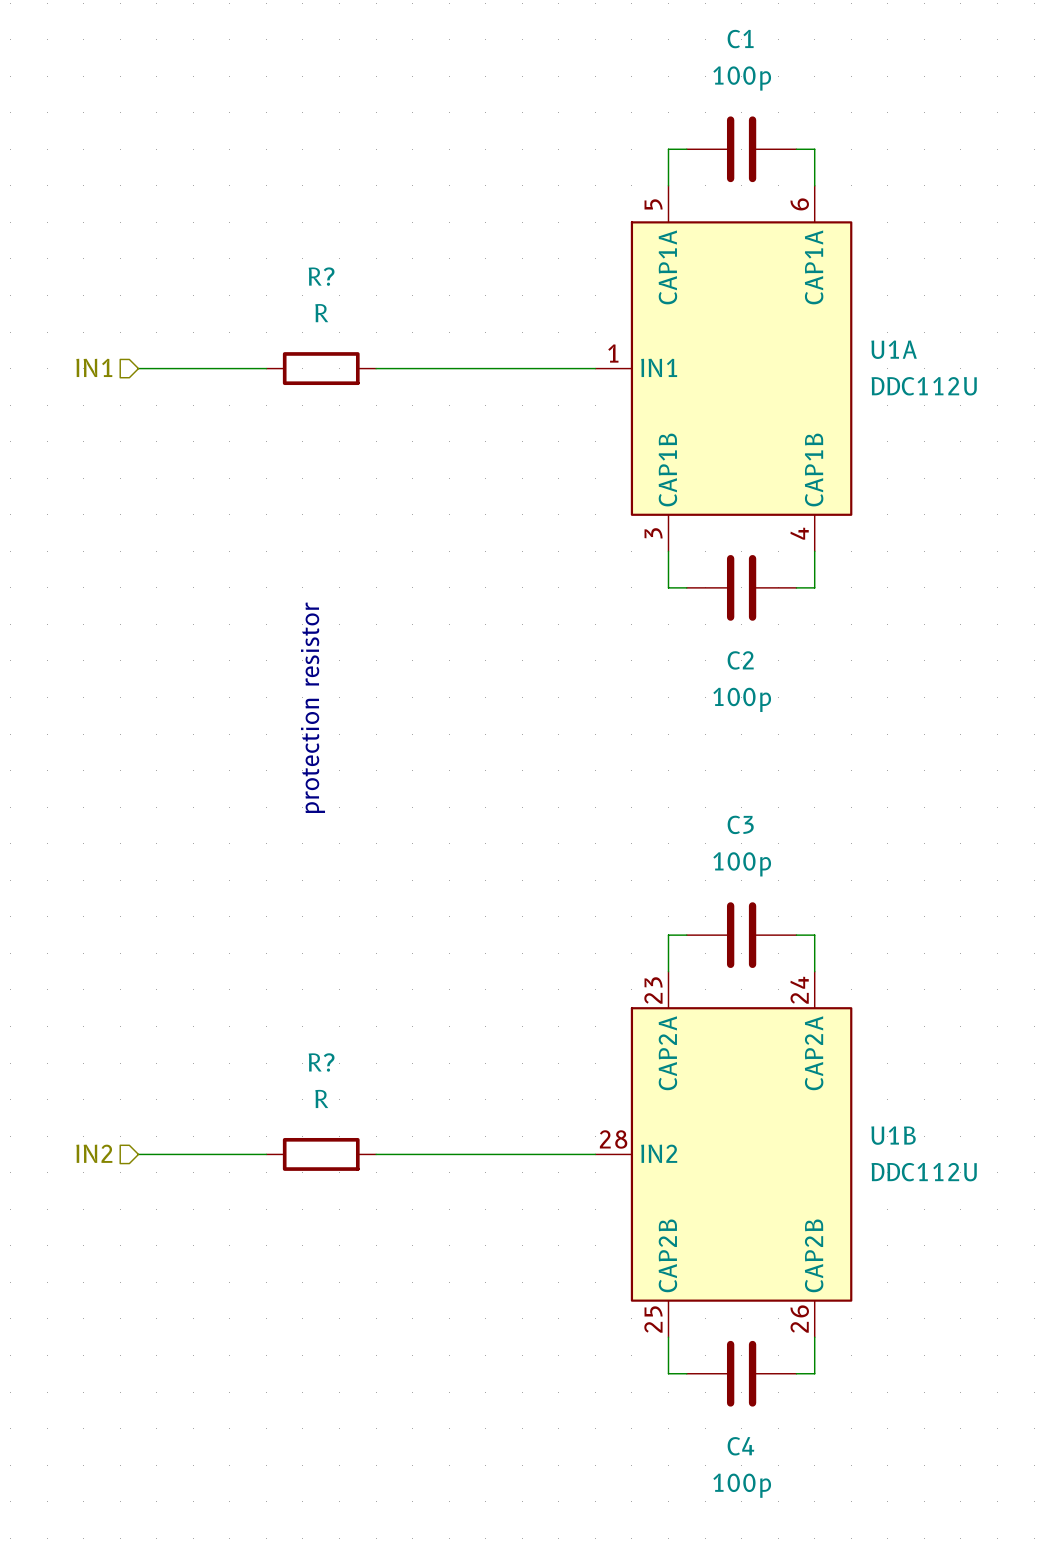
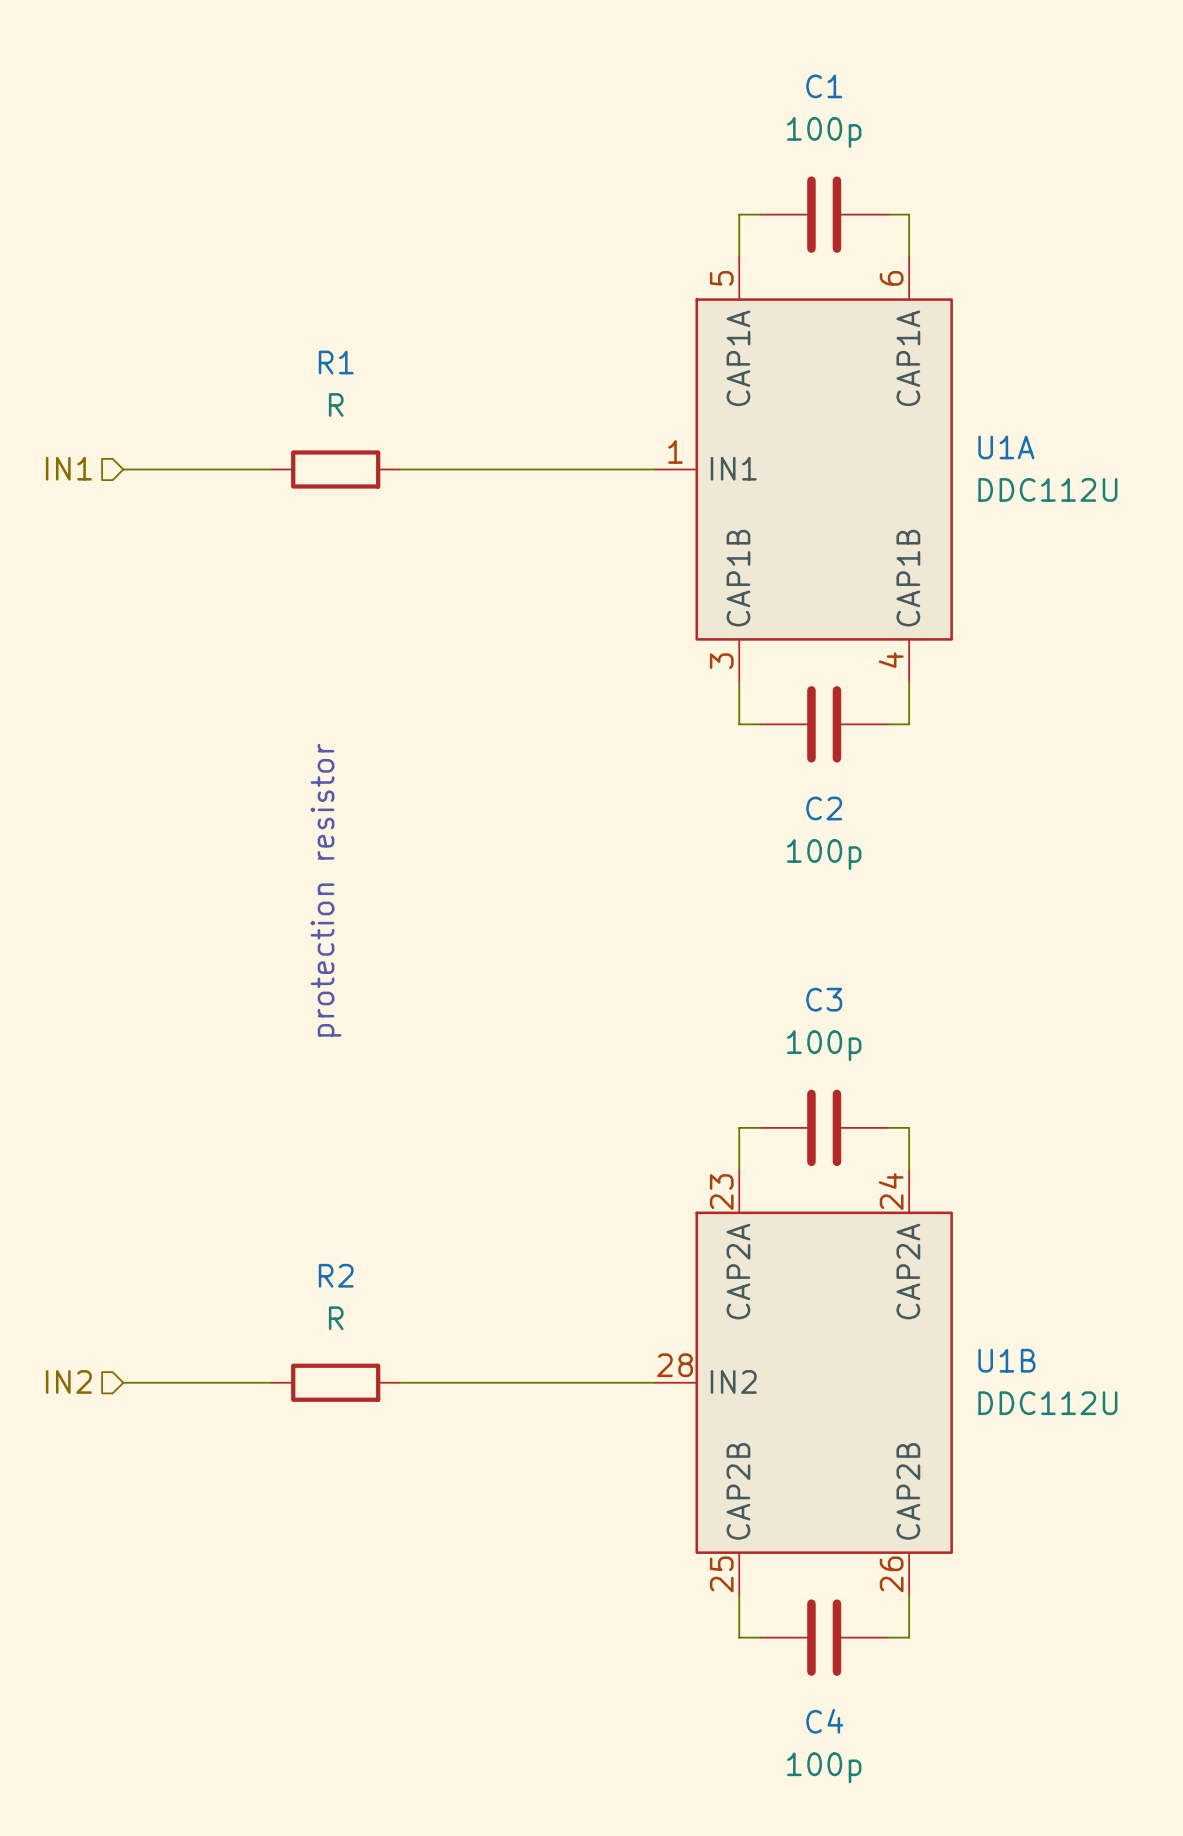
R? name: R? (321, 276) -> R1 (336, 362)
R? name: R? (321, 1062) -> R2 (336, 1275)

